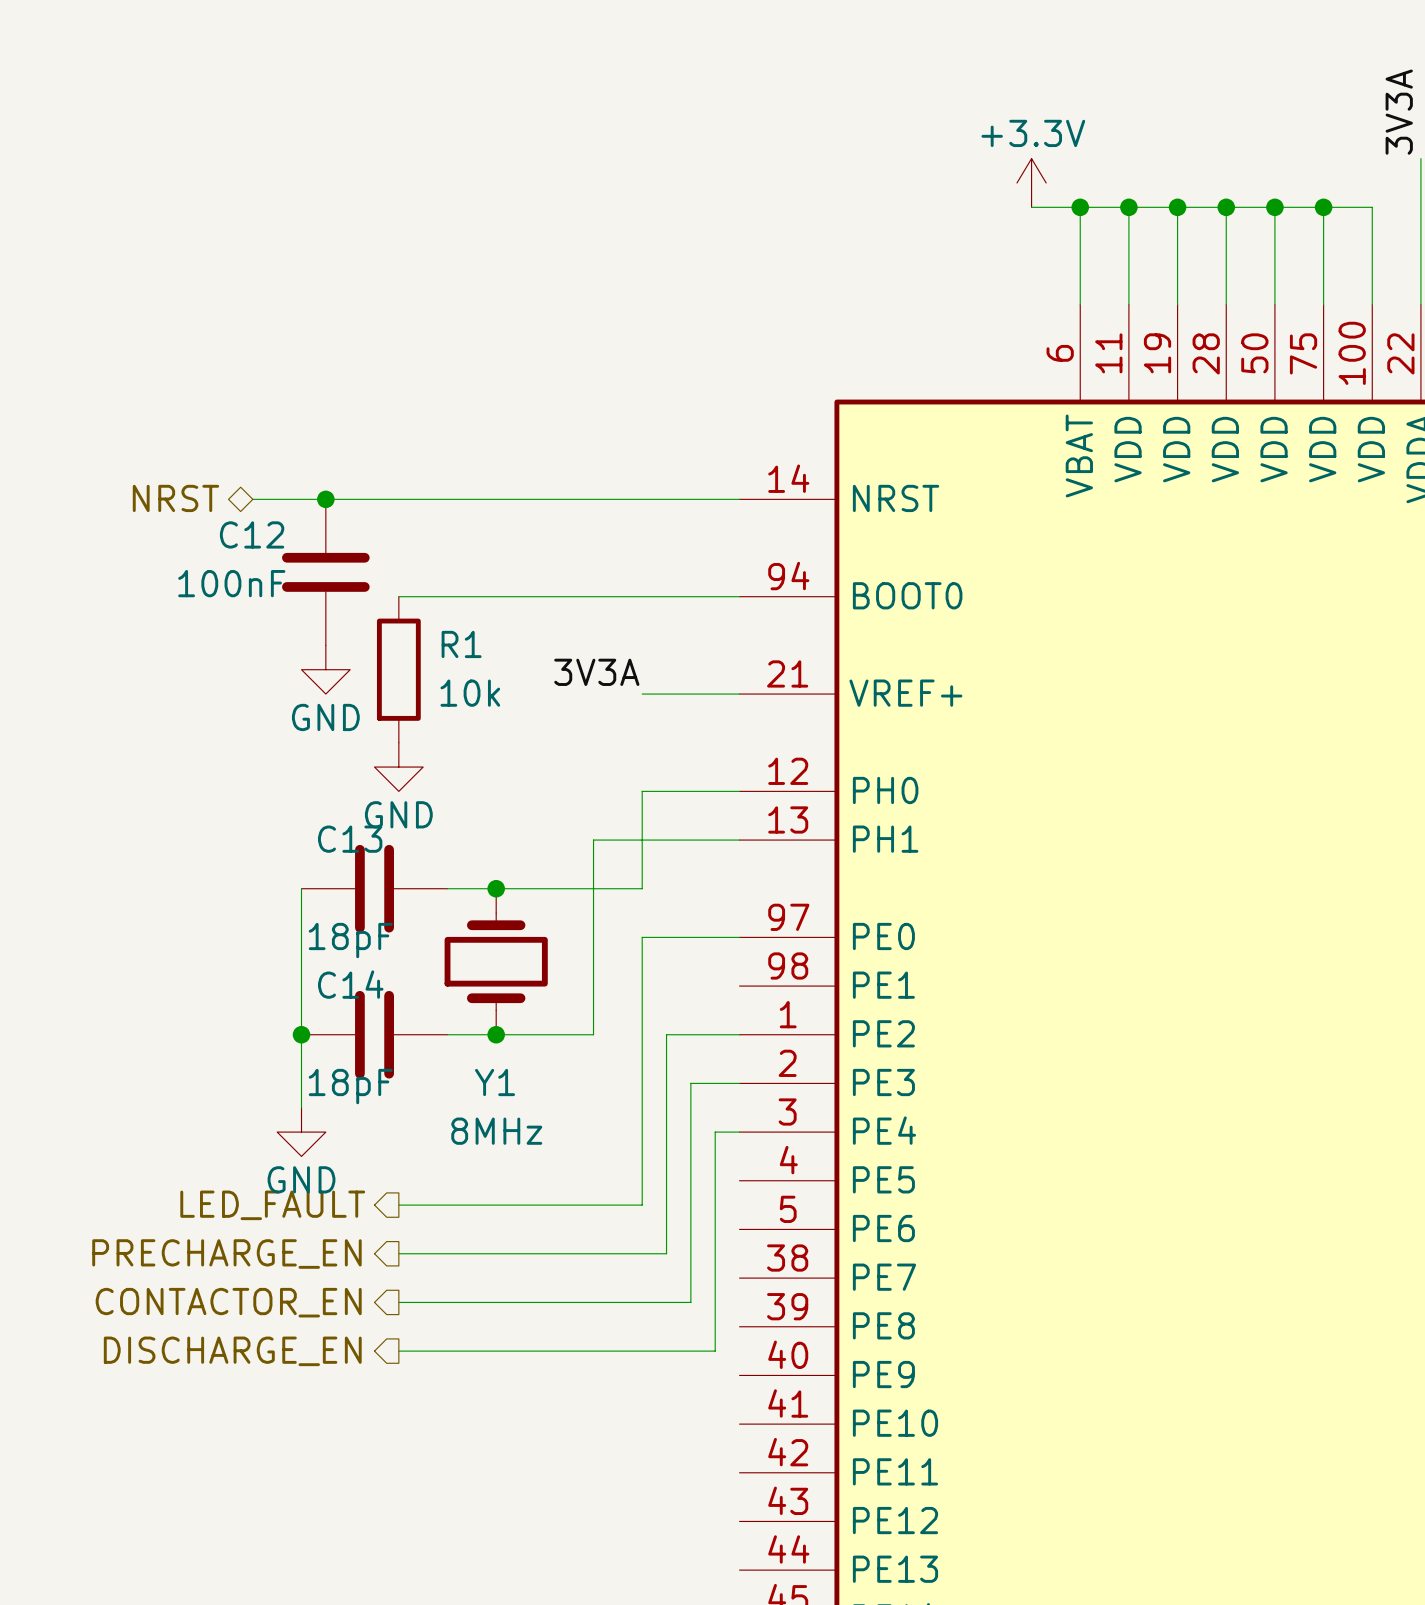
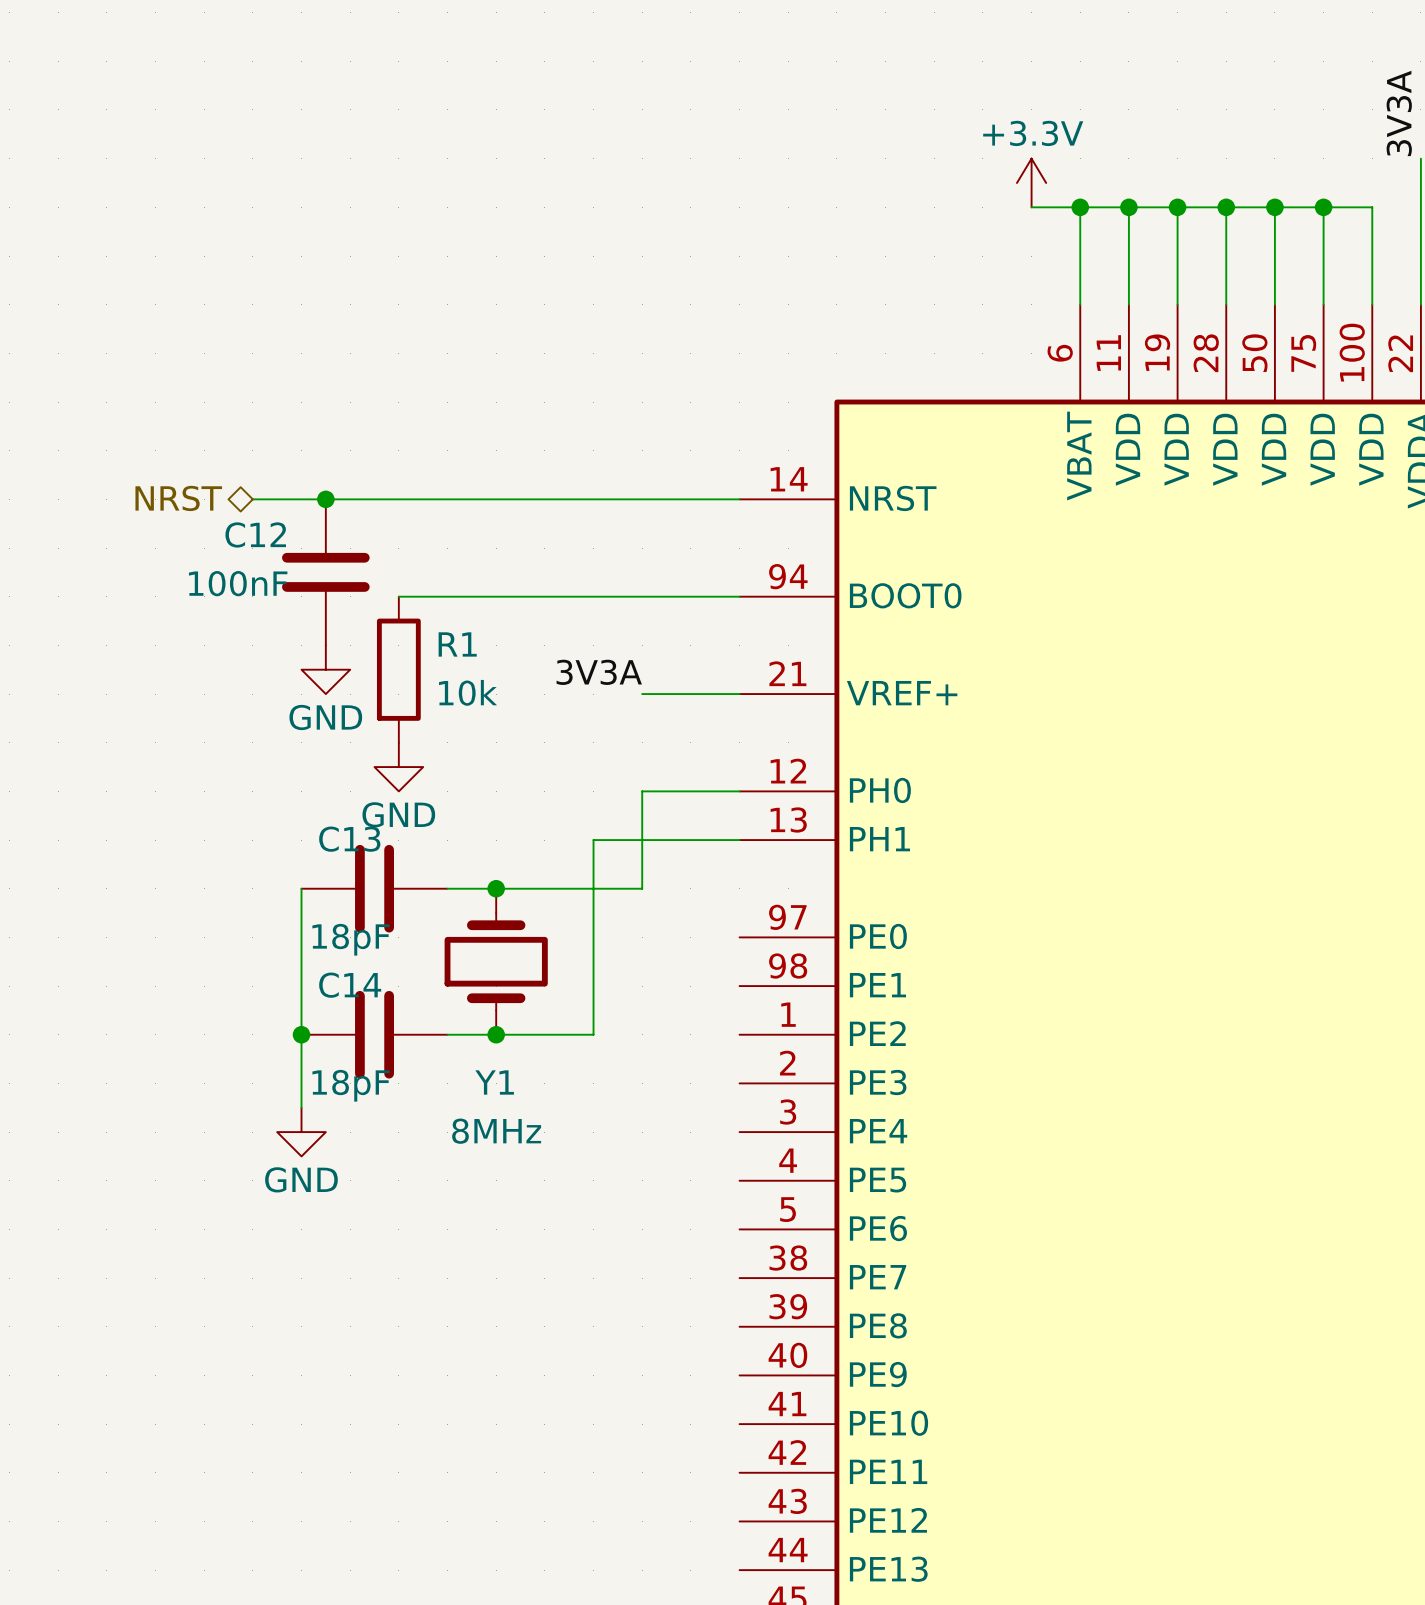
wire: (739, 937) (642, 937) (642, 1205) (398, 1205) -> none
wire: (739, 1034) (666, 1034) (666, 1253) (398, 1253) -> none
wire: (739, 1083) (690, 1083) (690, 1302) (398, 1302) -> none
wire: (739, 1132) (715, 1132) (715, 1351) (398, 1351) -> none
hierarchical label: LED_FAULT (272, 1205) -> none
hierarchical label: PRECHARGE_EN (226, 1254) -> none
hierarchical label: CONTACTOR_EN (228, 1302) -> none
hierarchical label: DISCHARGE_EN (232, 1351) -> none

